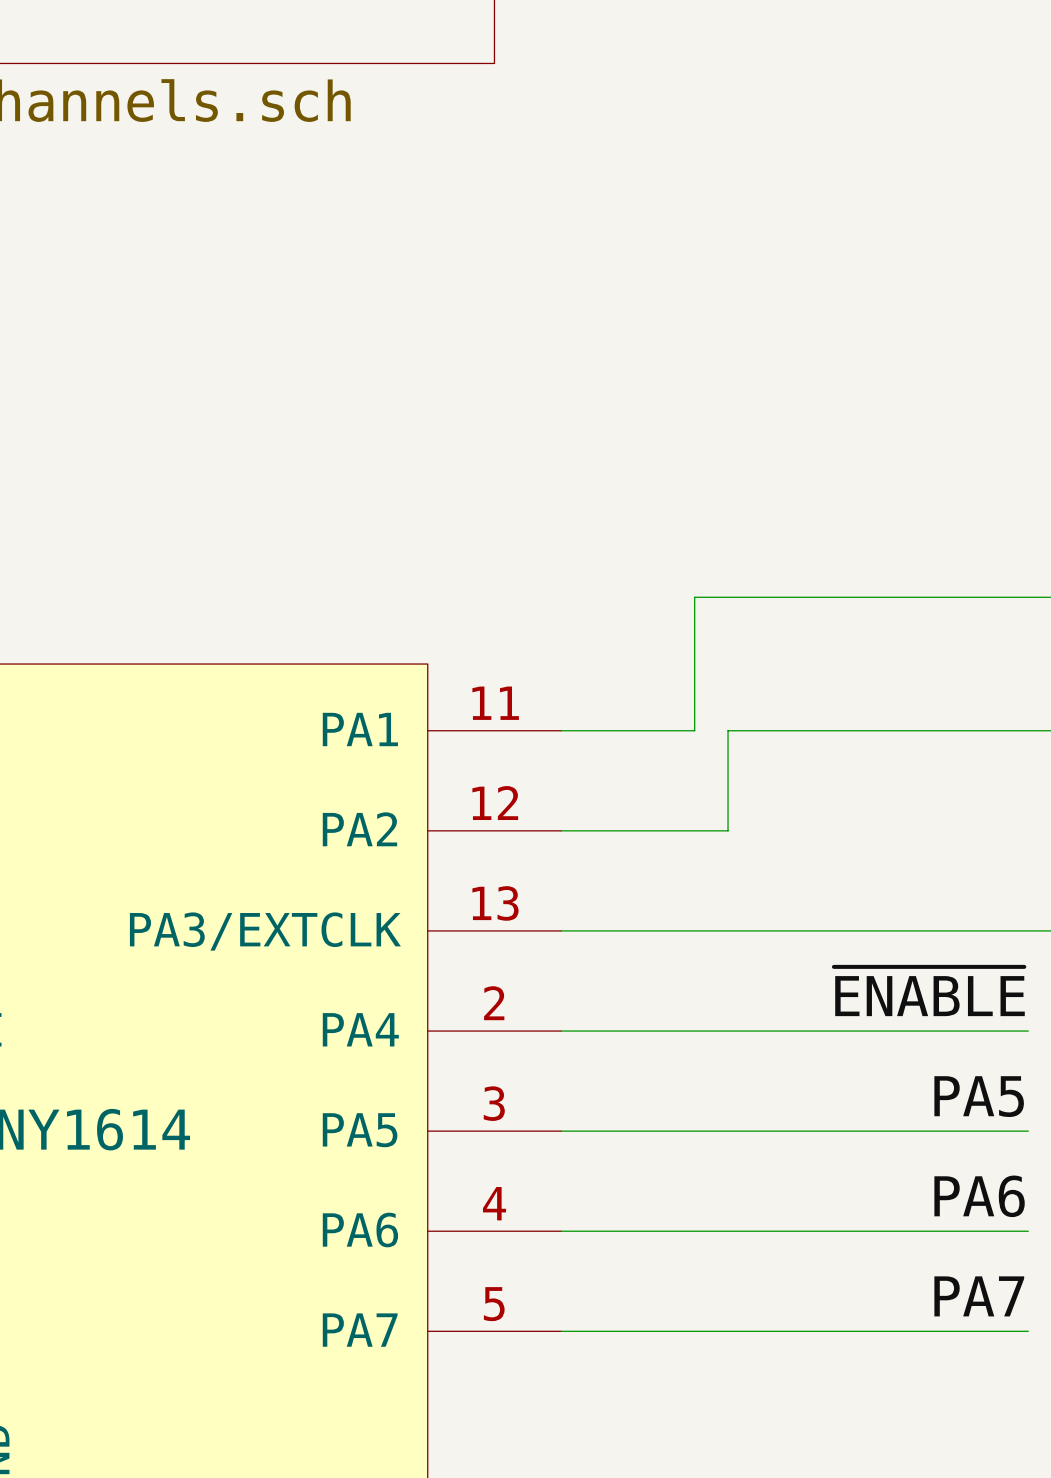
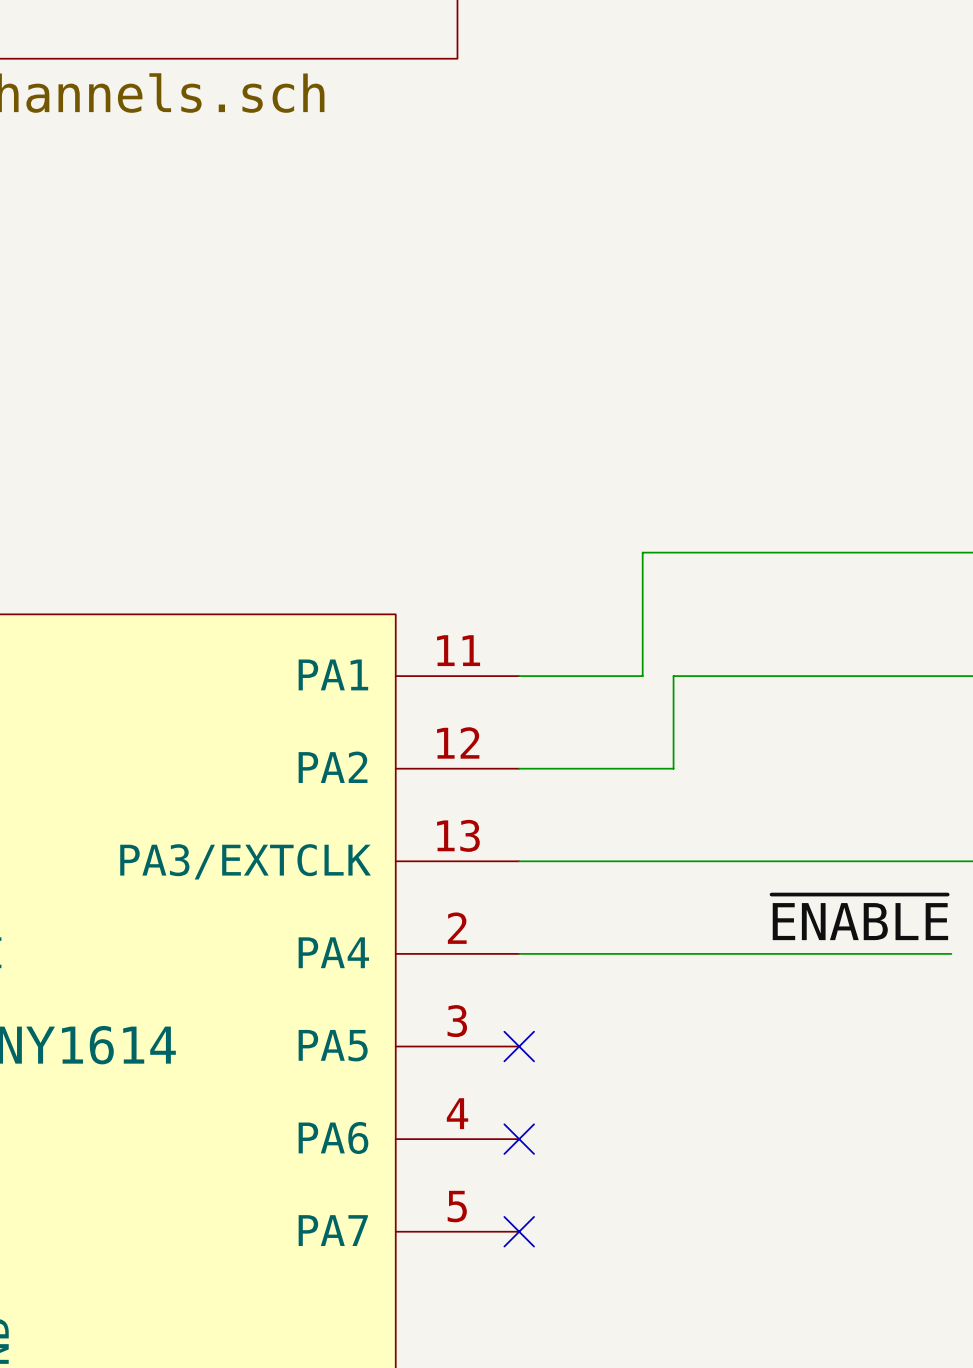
label: PA5 (979, 1096) -> none
wire: (561, 1131) (1028, 1131) -> none
no-connect mark: none -> (519, 1046)
label: PA6 (979, 1196) -> none
wire: (561, 1231) (1028, 1231) -> none
no-connect mark: none -> (519, 1139)
label: PA7 (979, 1296) -> none
wire: (561, 1331) (1028, 1331) -> none
no-connect mark: none -> (519, 1231)

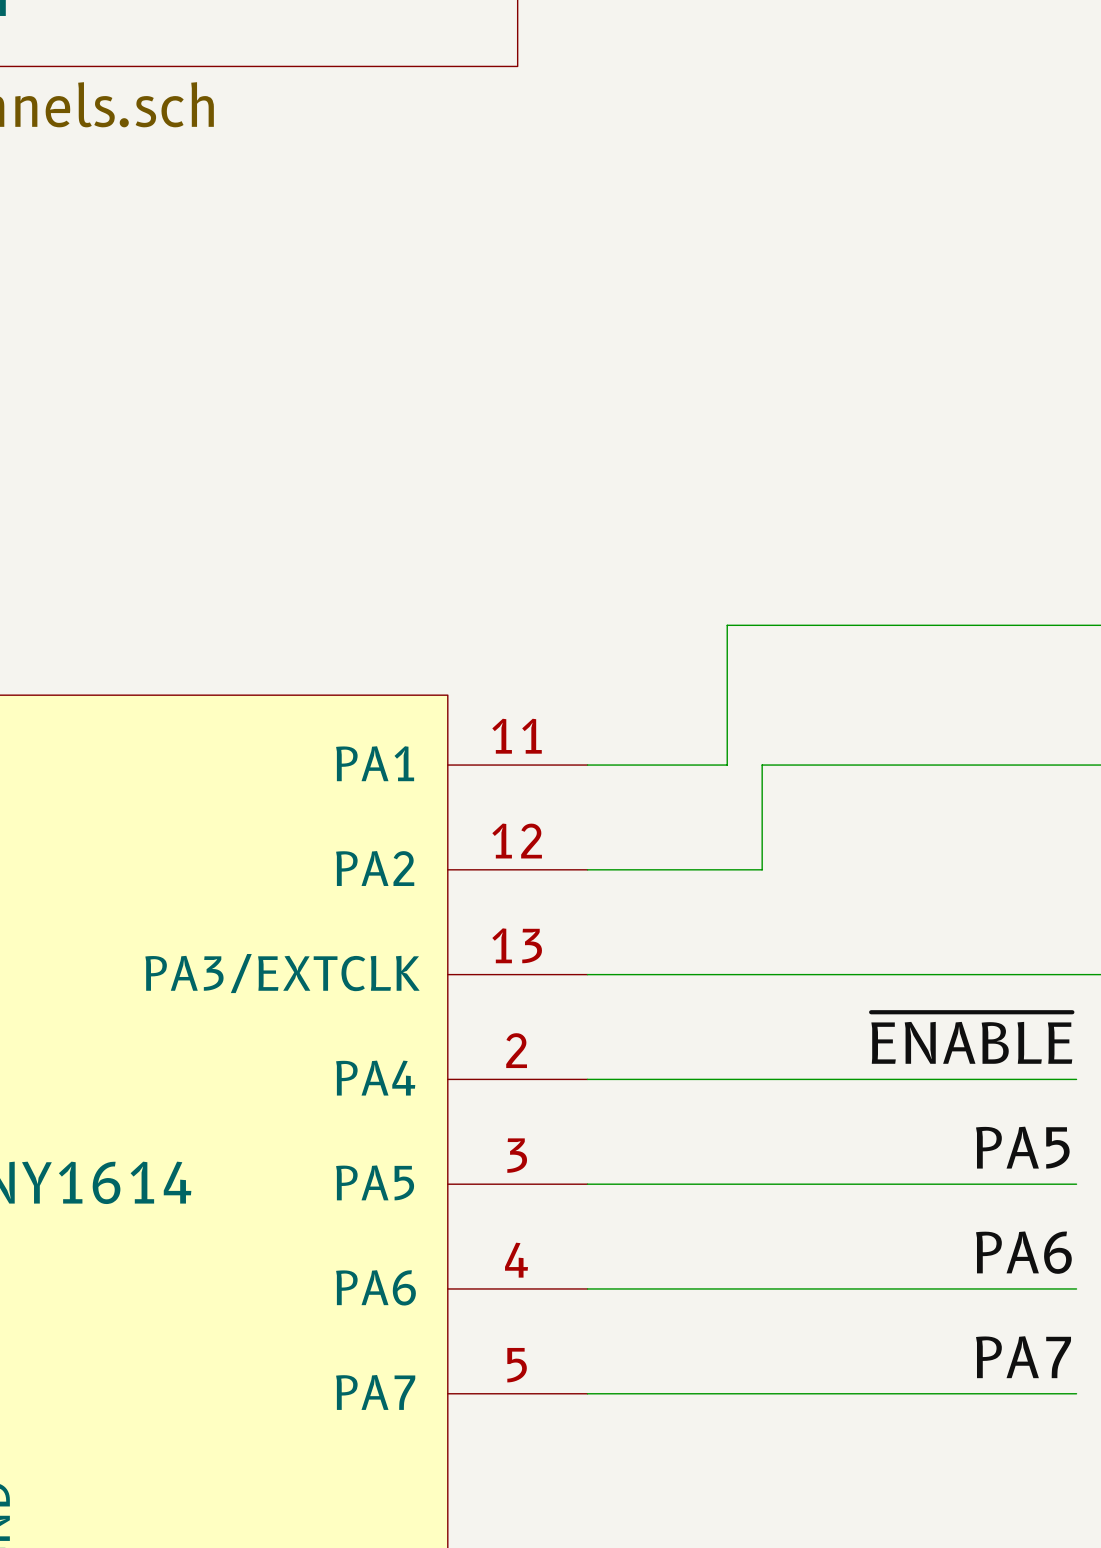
label: none -> PA5 (1022, 1147)
wire: none -> (587, 1184) (1076, 1184)
no-connect mark: (519, 1046) -> none
label: none -> PA6 (1023, 1252)
wire: none -> (587, 1288) (1076, 1288)
no-connect mark: (519, 1139) -> none
label: none -> PA7 (1023, 1357)
wire: none -> (587, 1393) (1076, 1393)
no-connect mark: (519, 1231) -> none

